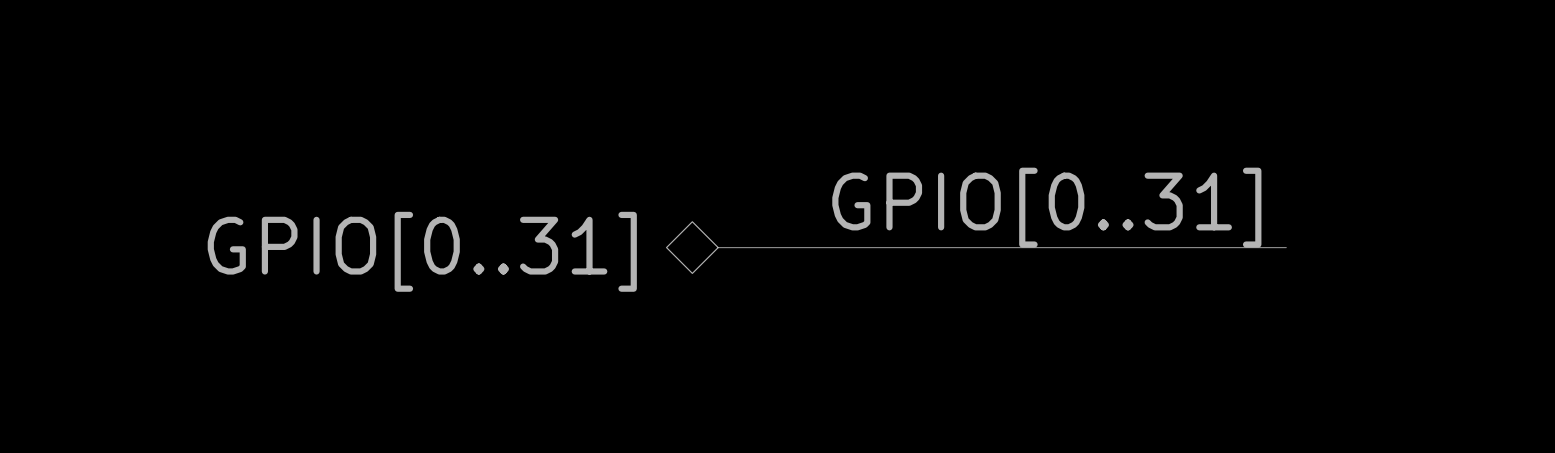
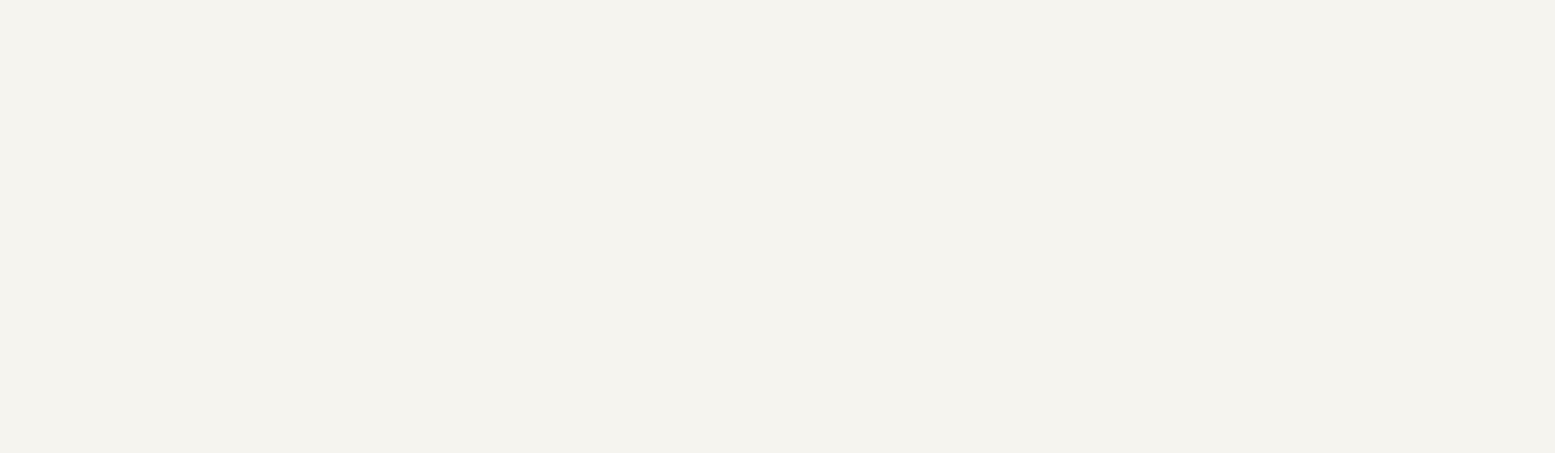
label: GPIO[0..31] (1046, 207) -> none
bus: (718, 247) (1286, 247) -> none
hierarchical label: GPIO[0..31] (422, 251) -> none

